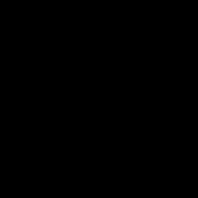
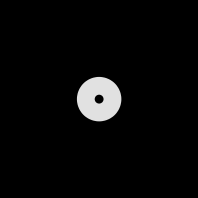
part: none -> (99, 99)

